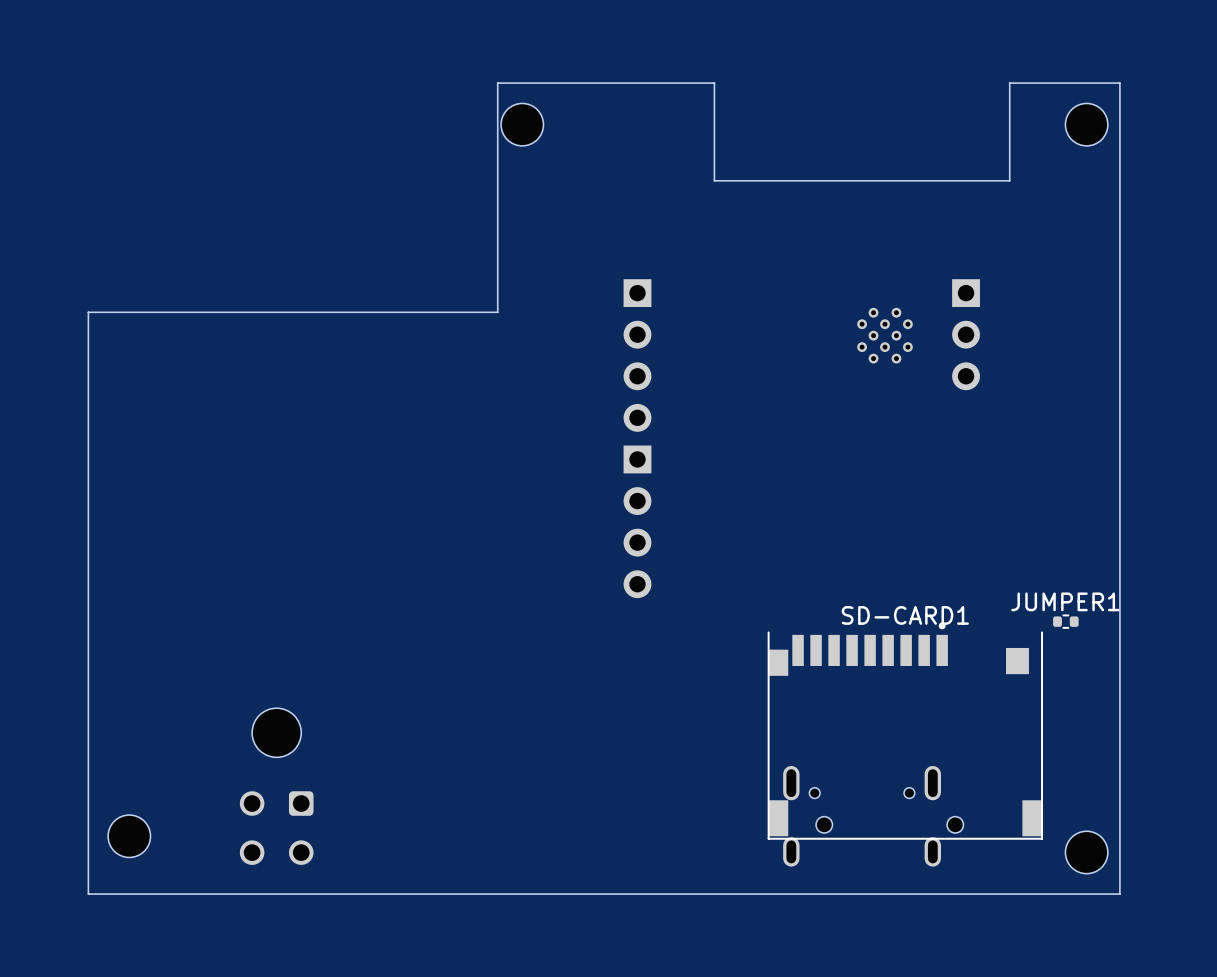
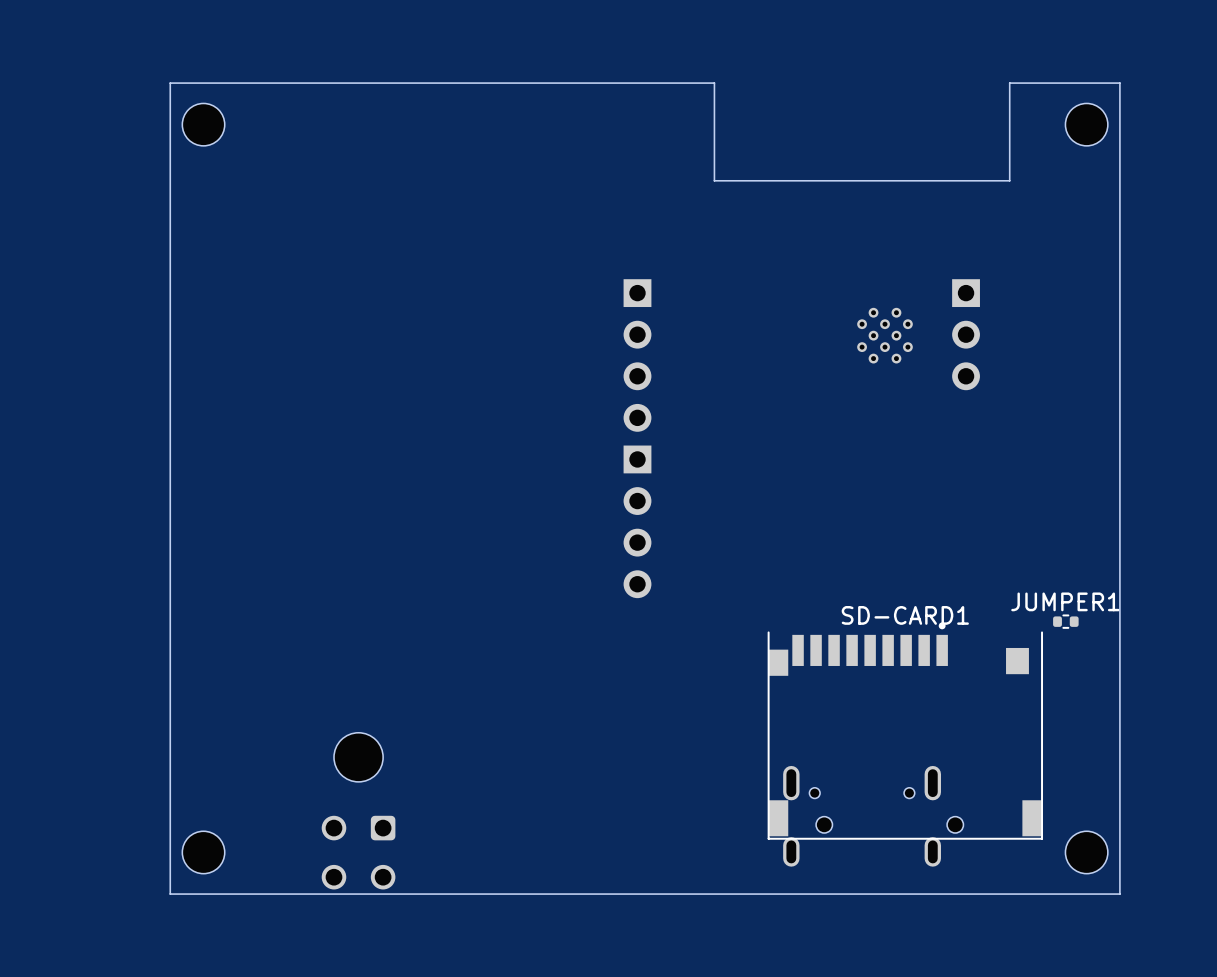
board edge: (497, 83) (497, 312) (88, 312) (88, 894) (170, 894) -> (497, 83) (170, 83) (170, 894)
part position: (522, 124) -> (203, 124)
part position: (276, 786) -> (358, 811)
part position: (129, 836) -> (203, 852)

